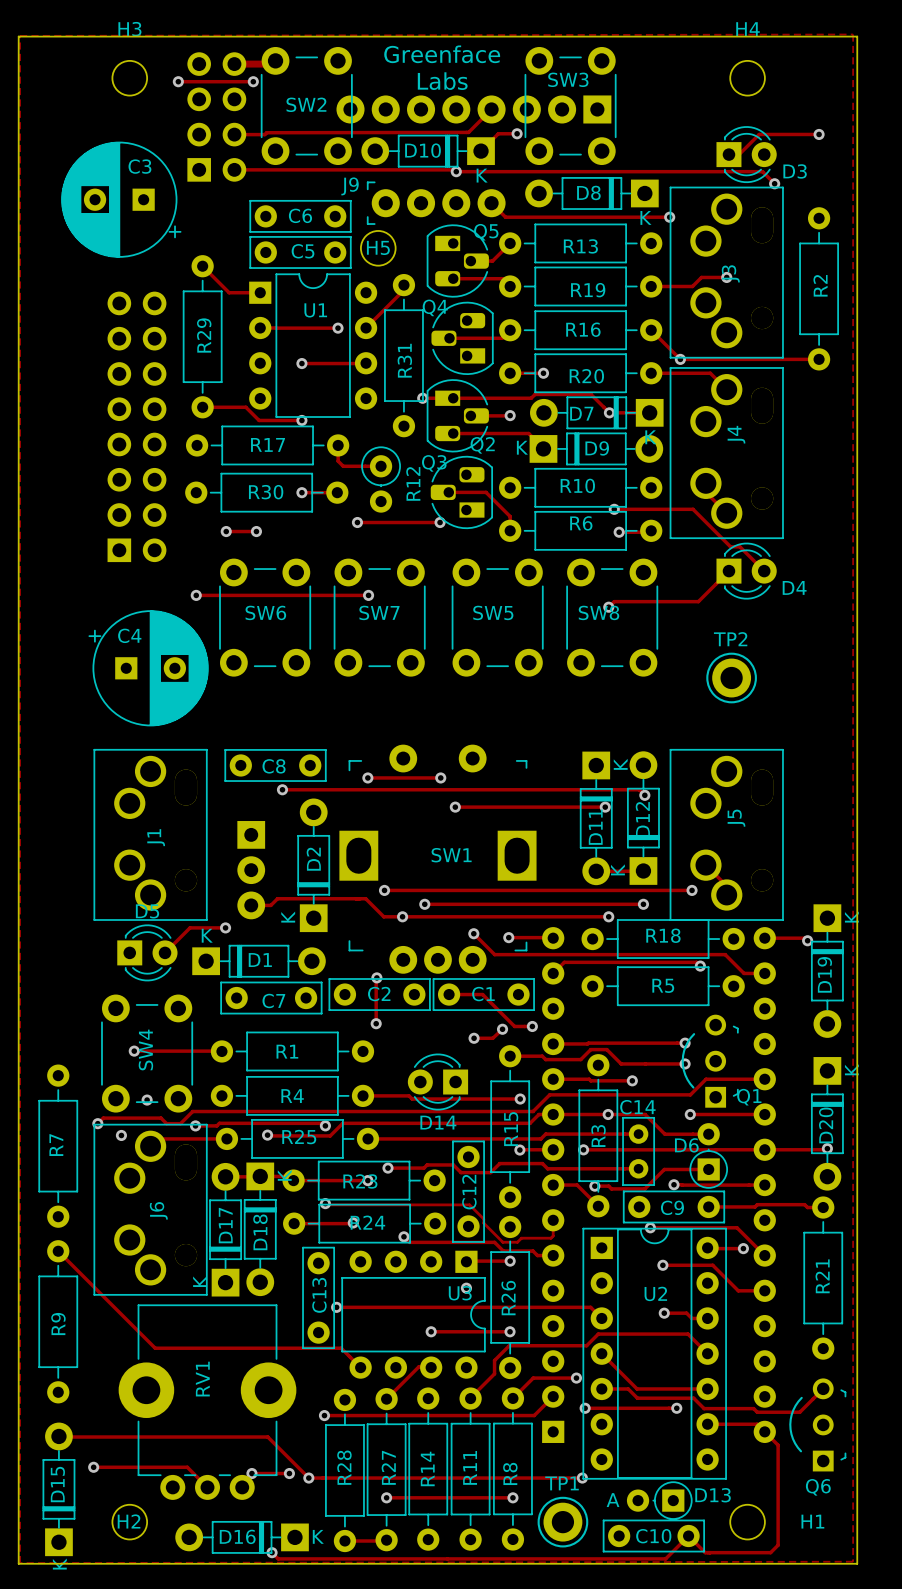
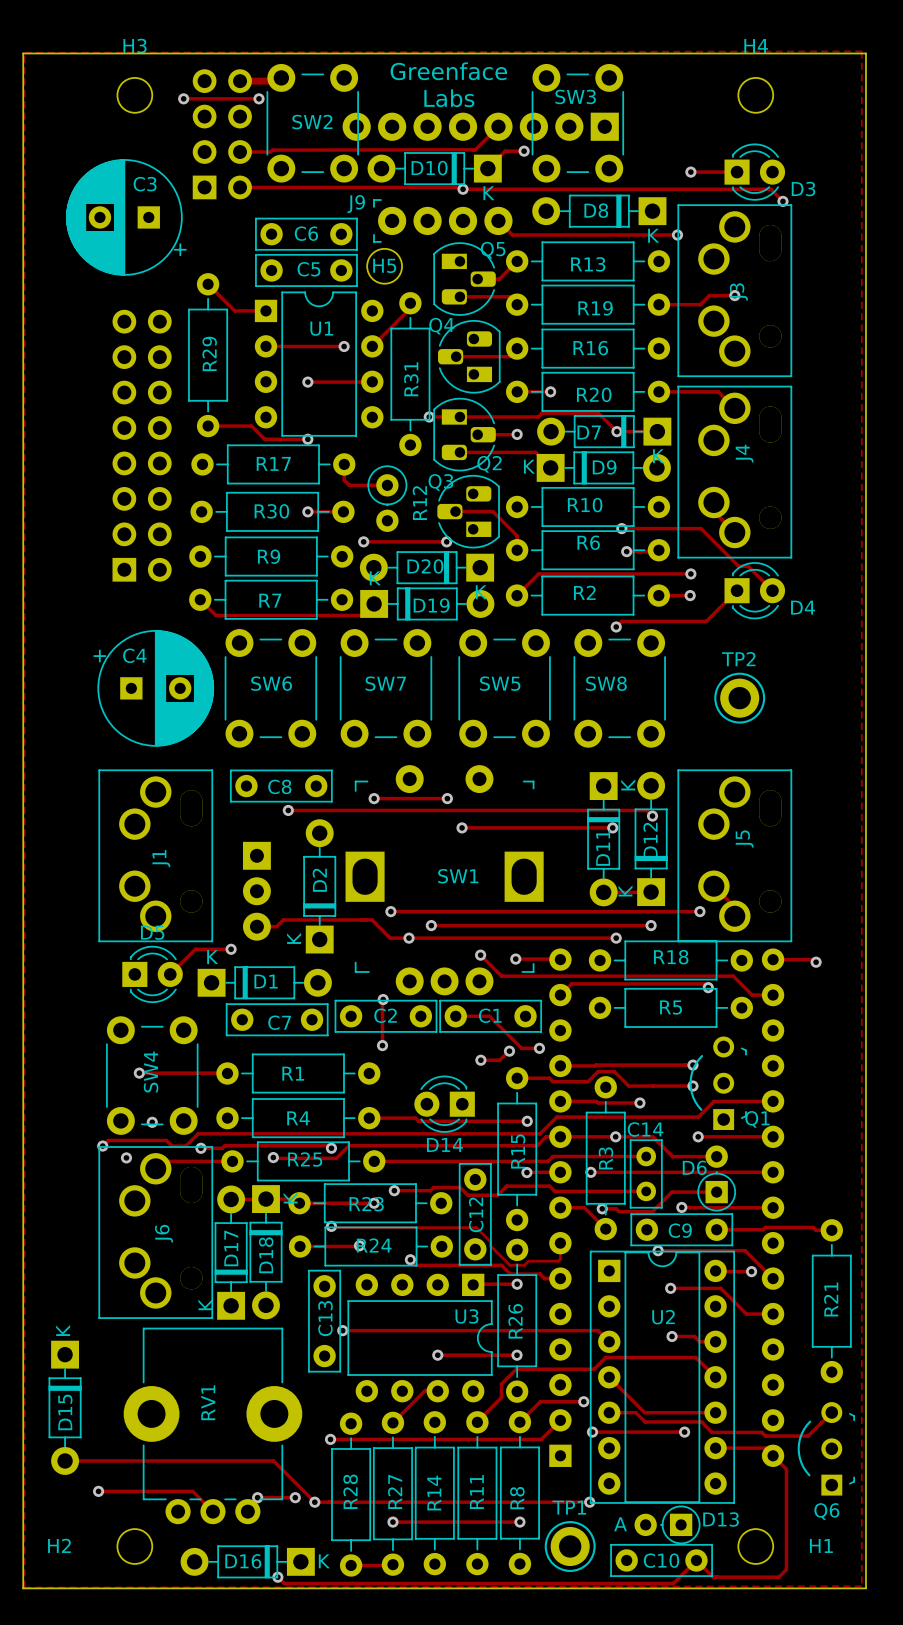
track: (819, 134) (759, 134) (739, 154) (728, 154) -> (690, 172) (737, 172)
via: (819, 134) -> none
via: none -> (690, 172)
R2 rotation: 0° (819, 288) -> 90° clockwise (587, 595)
R2 position: (819, 288) -> (587, 595)
track: (651, 330) (680, 359) (819, 359) -> none
via: (680, 359) -> none
track: (226, 531) (256, 531) -> none
via: (226, 531) -> none
via: (256, 531) -> none
track: none -> (690, 573) (538, 573) (517, 595)
via: none -> (690, 573)
track: none -> (658, 595) (690, 595)
via: none -> (690, 595)
track: none -> (200, 599) (215, 615) (362, 615) (374, 603)
track: (196, 595) (368, 595) -> none
via: (196, 595) -> none
via: (368, 595) -> none
SW6 position: (265, 617) -> (270, 688)
SW7 position: (379, 617) -> (385, 688)
SW5 position: (497, 617) -> (504, 688)
SW8 position: (612, 617) -> (619, 688)
D19 rotation: 0° (827, 971) -> 90° counterclockwise (427, 603)
D19 position: (827, 971) -> (427, 603)
D20 rotation: 0° (827, 1123) -> 90° clockwise (427, 567)
D20 position: (827, 1123) -> (427, 567)
R7 rotation: 0° (58, 1146) -> 90° clockwise (271, 599)
R7 position: (58, 1146) -> (271, 599)
track: (827, 1148) (764, 1149) -> none
via: (827, 1148) -> none
track: (58, 1251) (155, 1348) (341, 1348) (360, 1367) -> none
via: (466, 1288) -> none
R9 rotation: 0° (58, 1321) -> 90° clockwise (271, 556)
R9 position: (58, 1321) -> (271, 556)
D15 rotation: 0° (58, 1489) -> 180° (65, 1407)
D15 position: (58, 1489) -> (65, 1407)
H2 name position: H2 (129, 1521) -> H2 (59, 1545)

